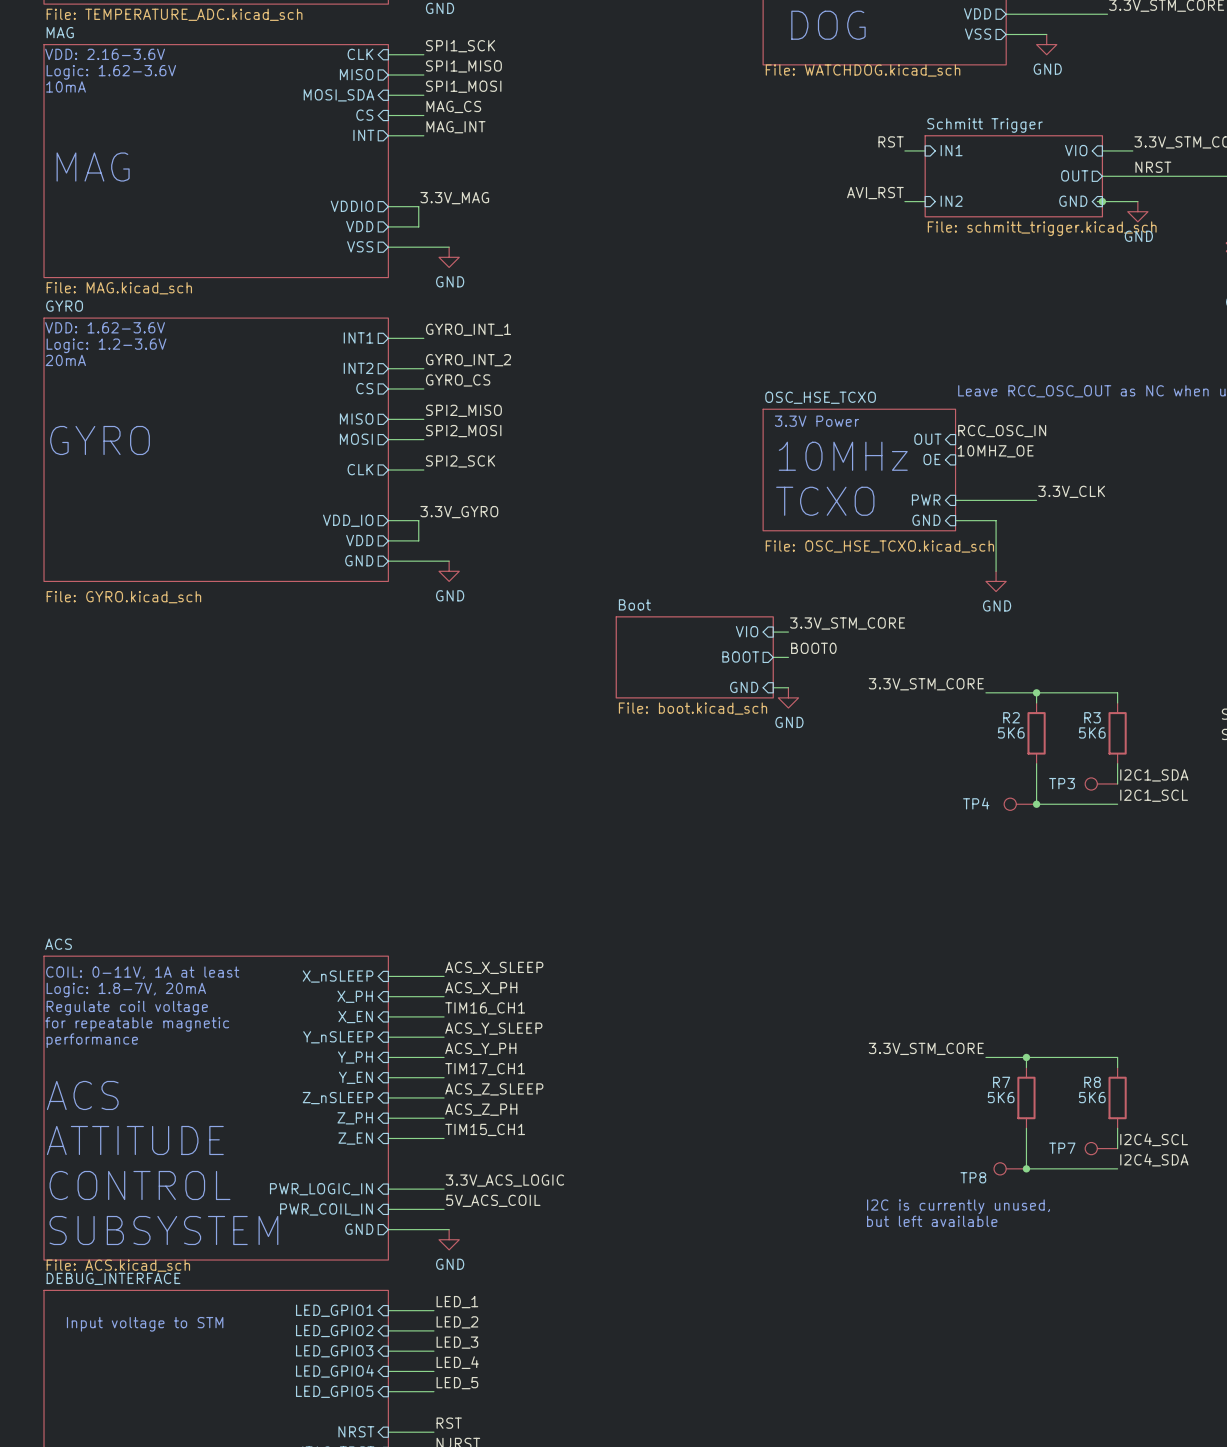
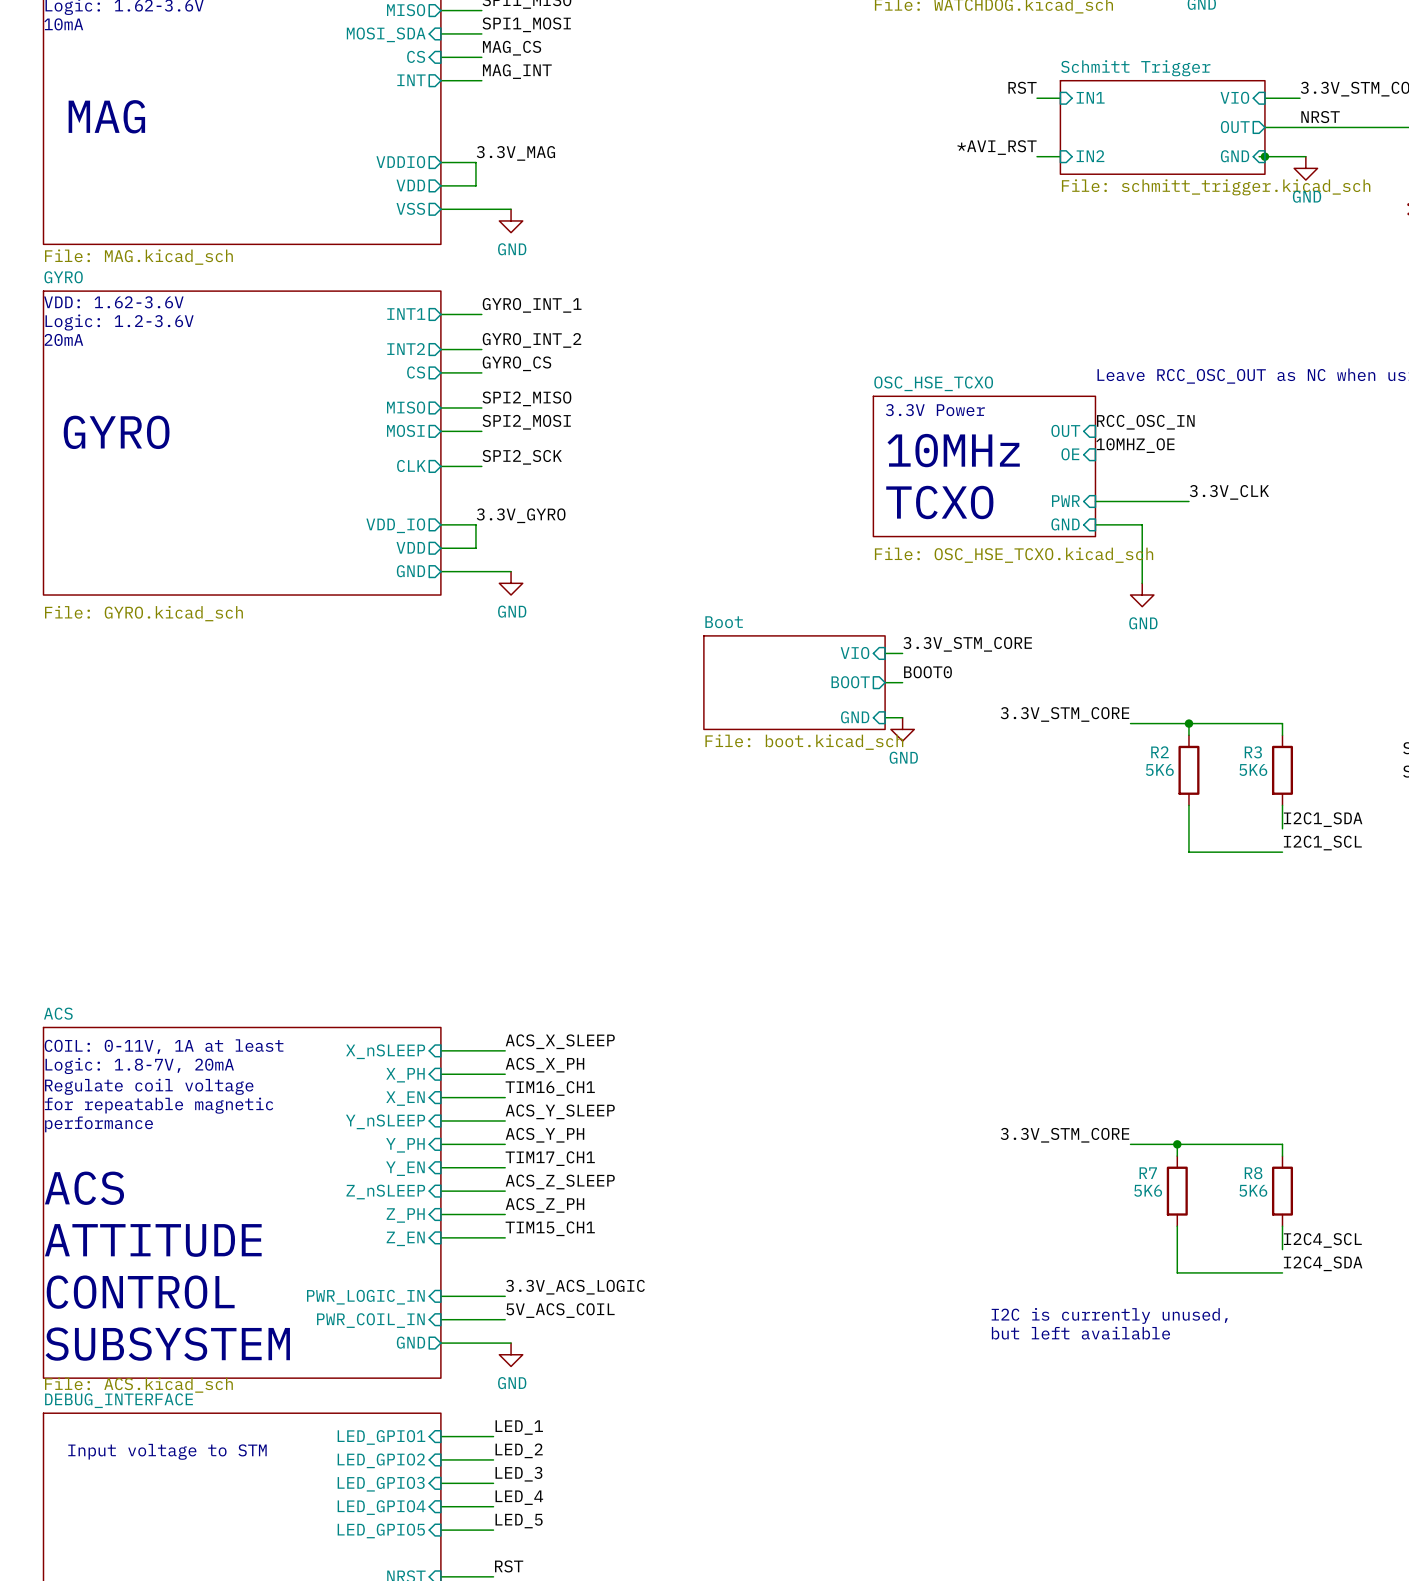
label: AVI_RST (875, 193) -> *AVI_RST (996, 147)
TP3: (1101, 783) -> none
TP4: (1020, 804) -> none
junction: (1036, 804) -> none
TP7: (1101, 1148) -> none
TP8: (1010, 1168) -> none
junction: (1026, 1168) -> none

